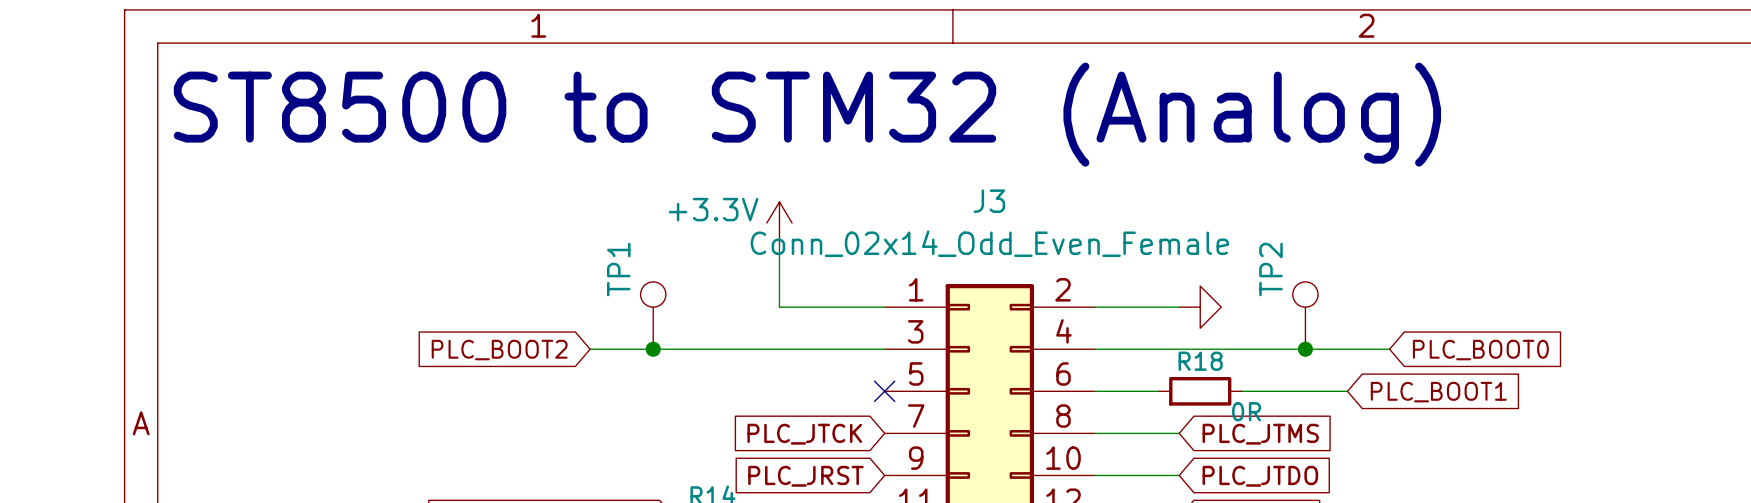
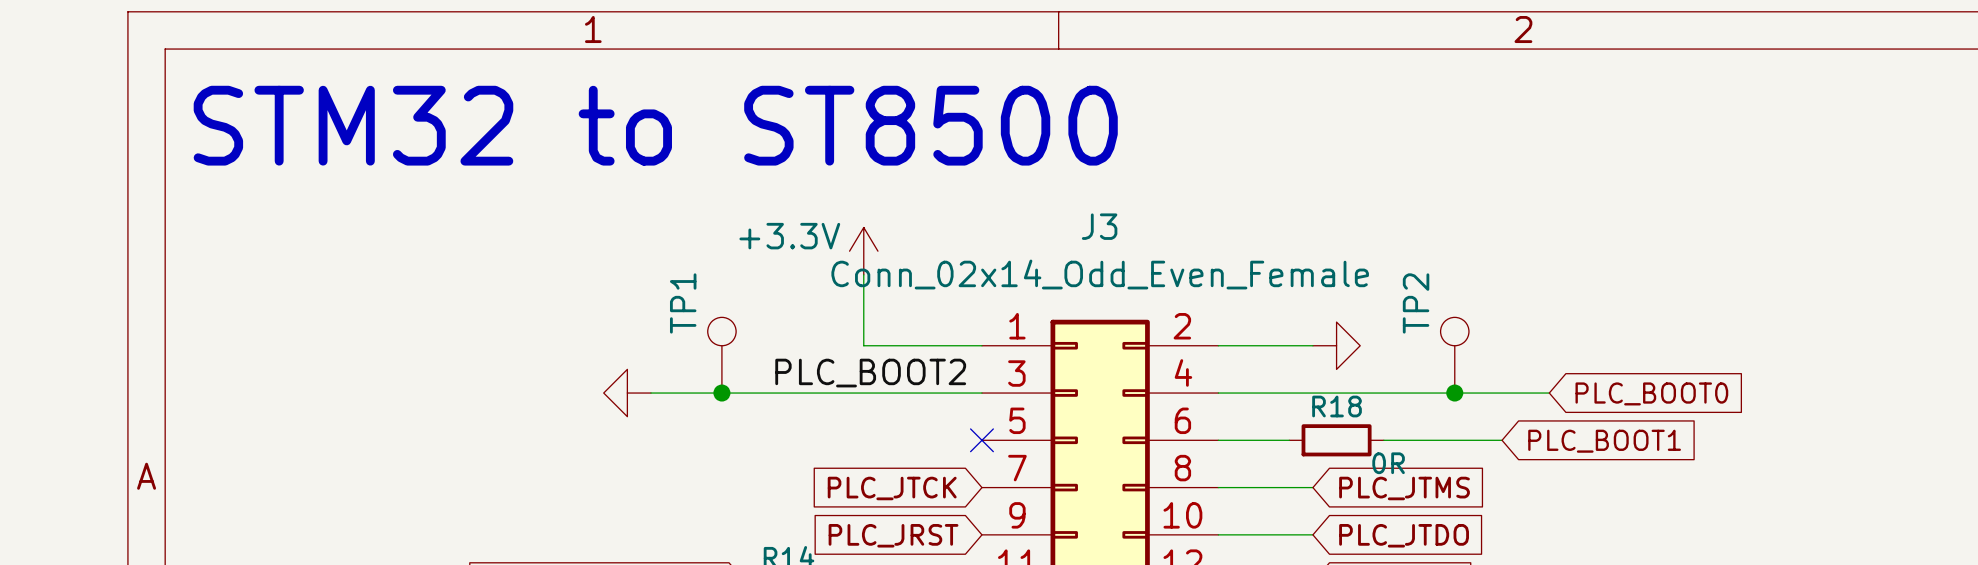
text: none -> STM32 to ST8500 (655, 125)
text: ST8500 to STM32 (Analog) (807, 114) -> none
label: none -> PLC_BOOT2 (870, 373)
power symbol: none -> (627, 393)
global label: PLC_BOOT2 (499, 350) -> none

